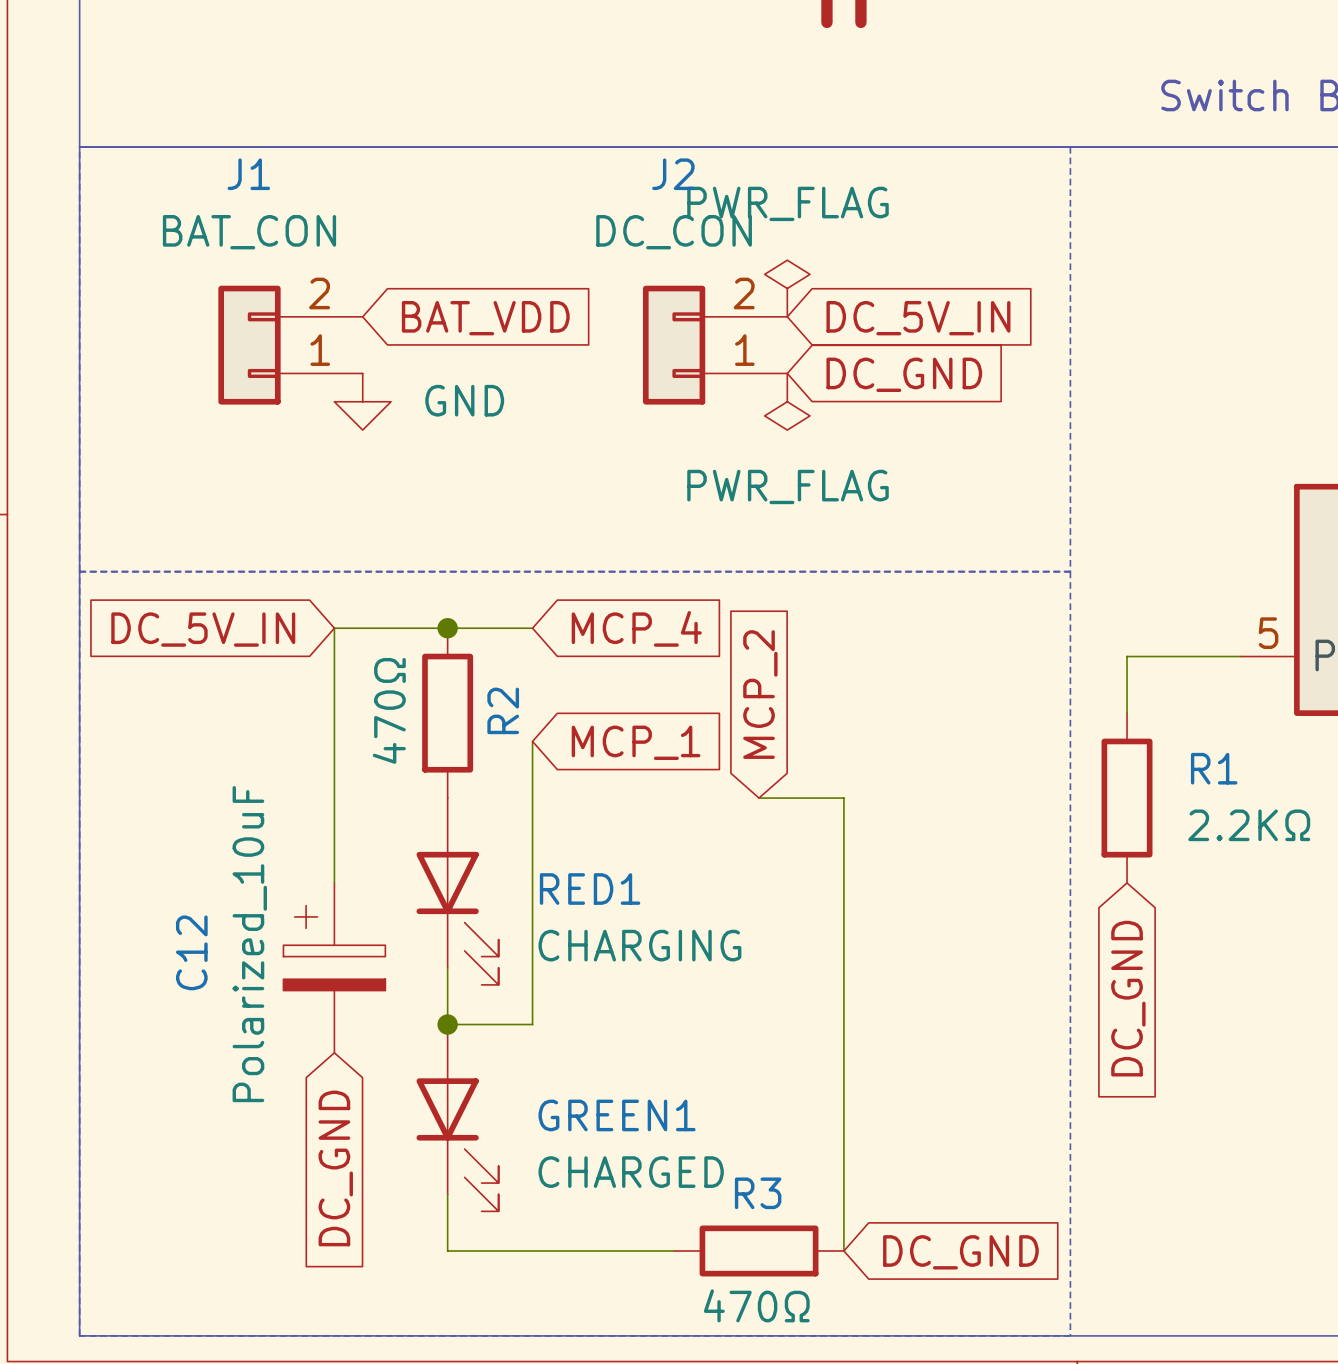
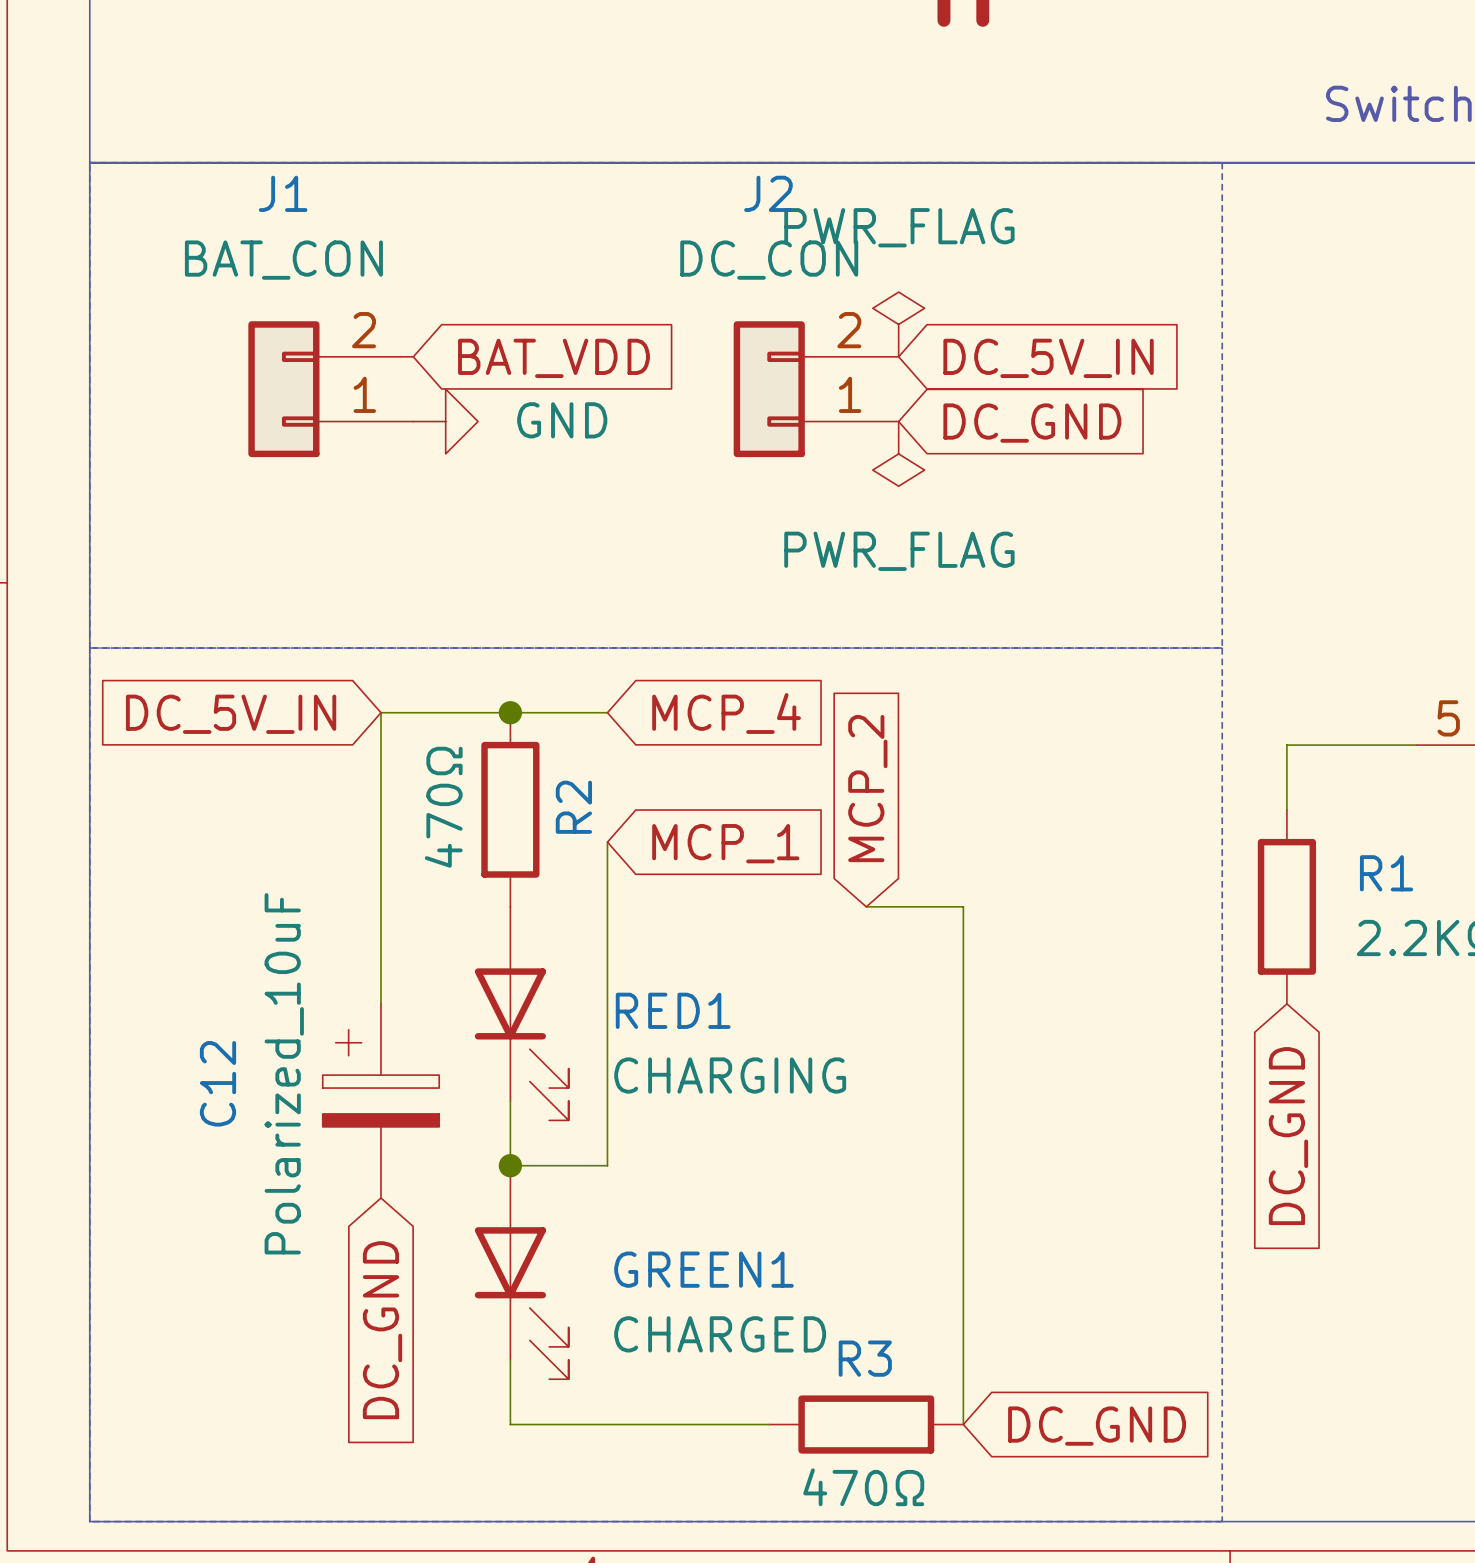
power symbol rotation: 0° (362, 401) -> 90° counterclockwise (445, 421)
power symbol position: GND (362, 401) -> GND (445, 421)

